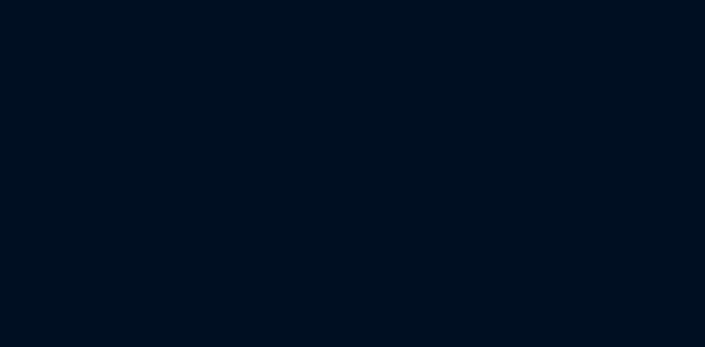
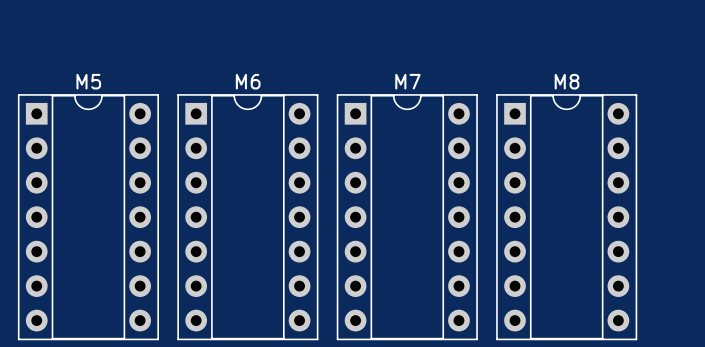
M5: none -> (88, 217)
M6: none -> (247, 217)
M7: none -> (407, 217)
M8: none -> (566, 217)

